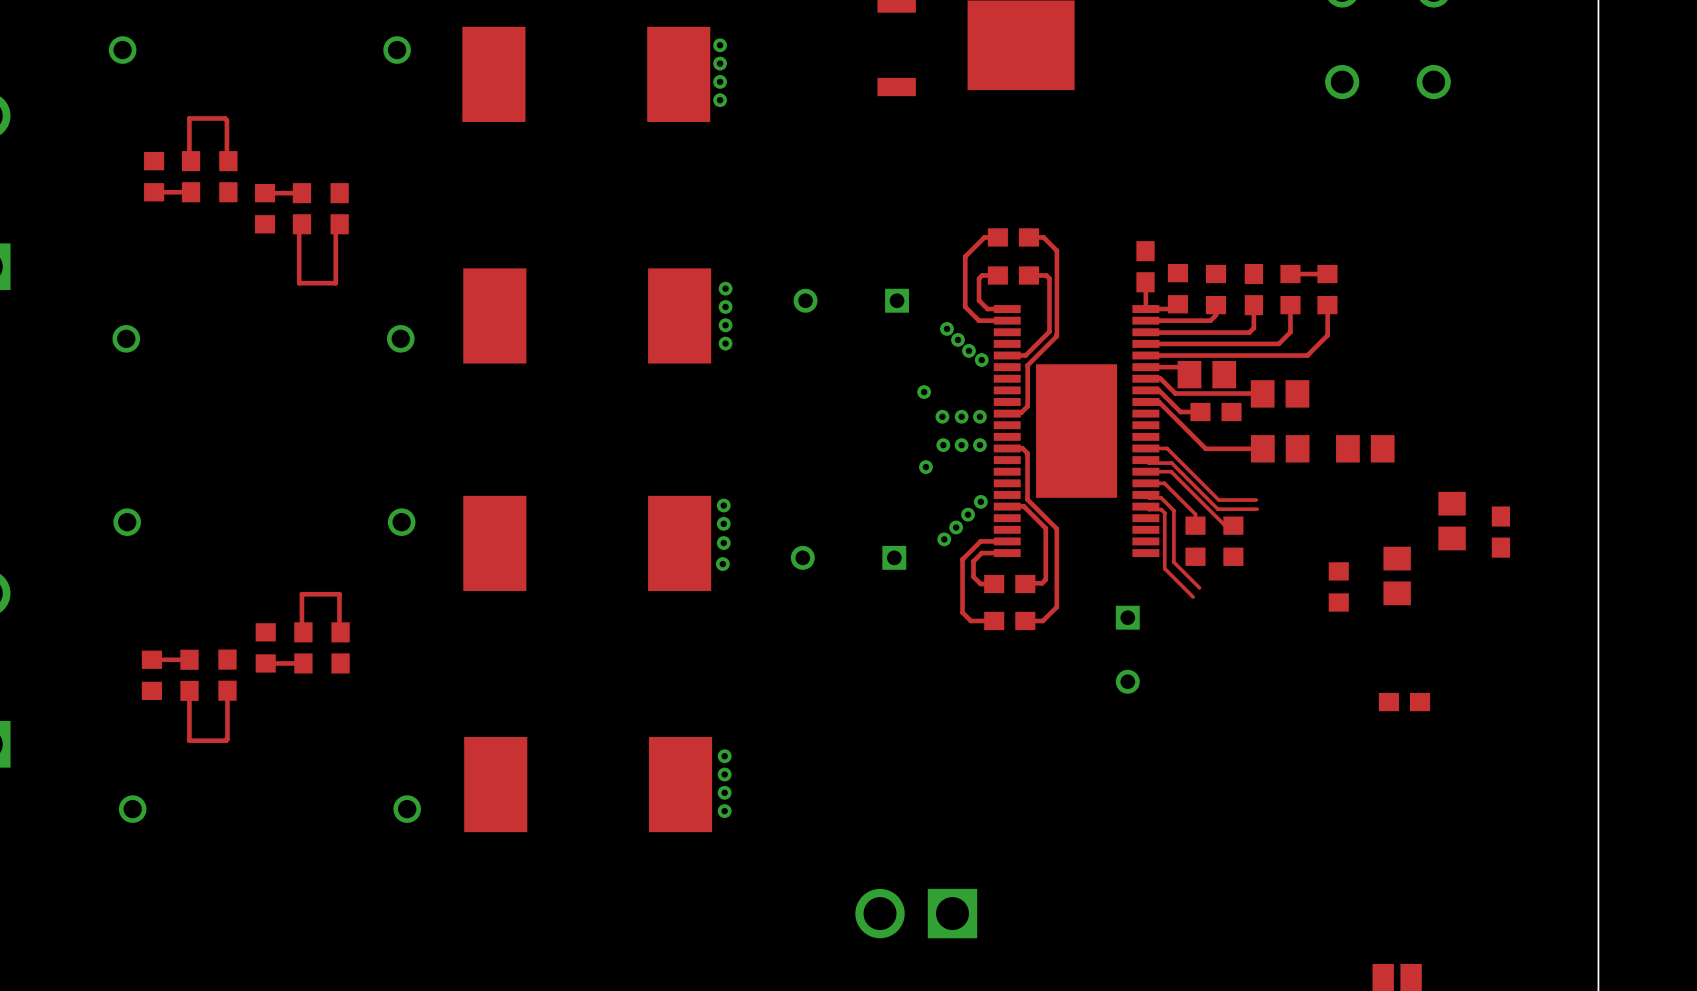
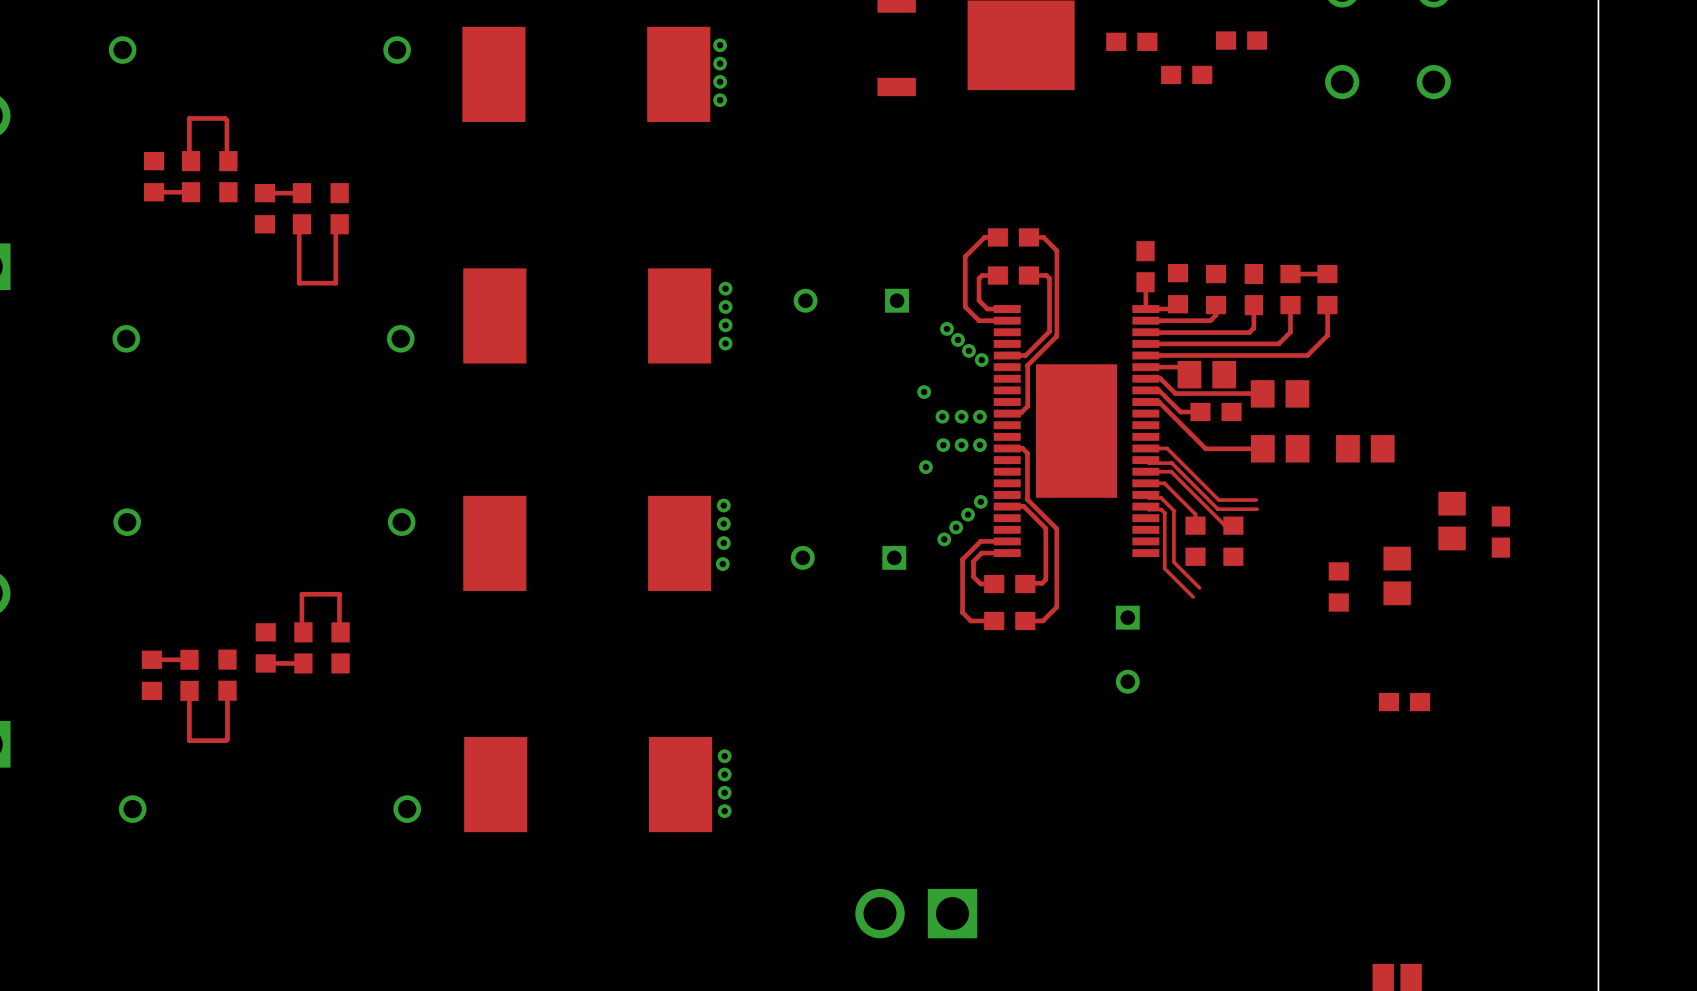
part: none -> (1241, 40)
part: none -> (1131, 41)
part: none -> (1186, 74)

